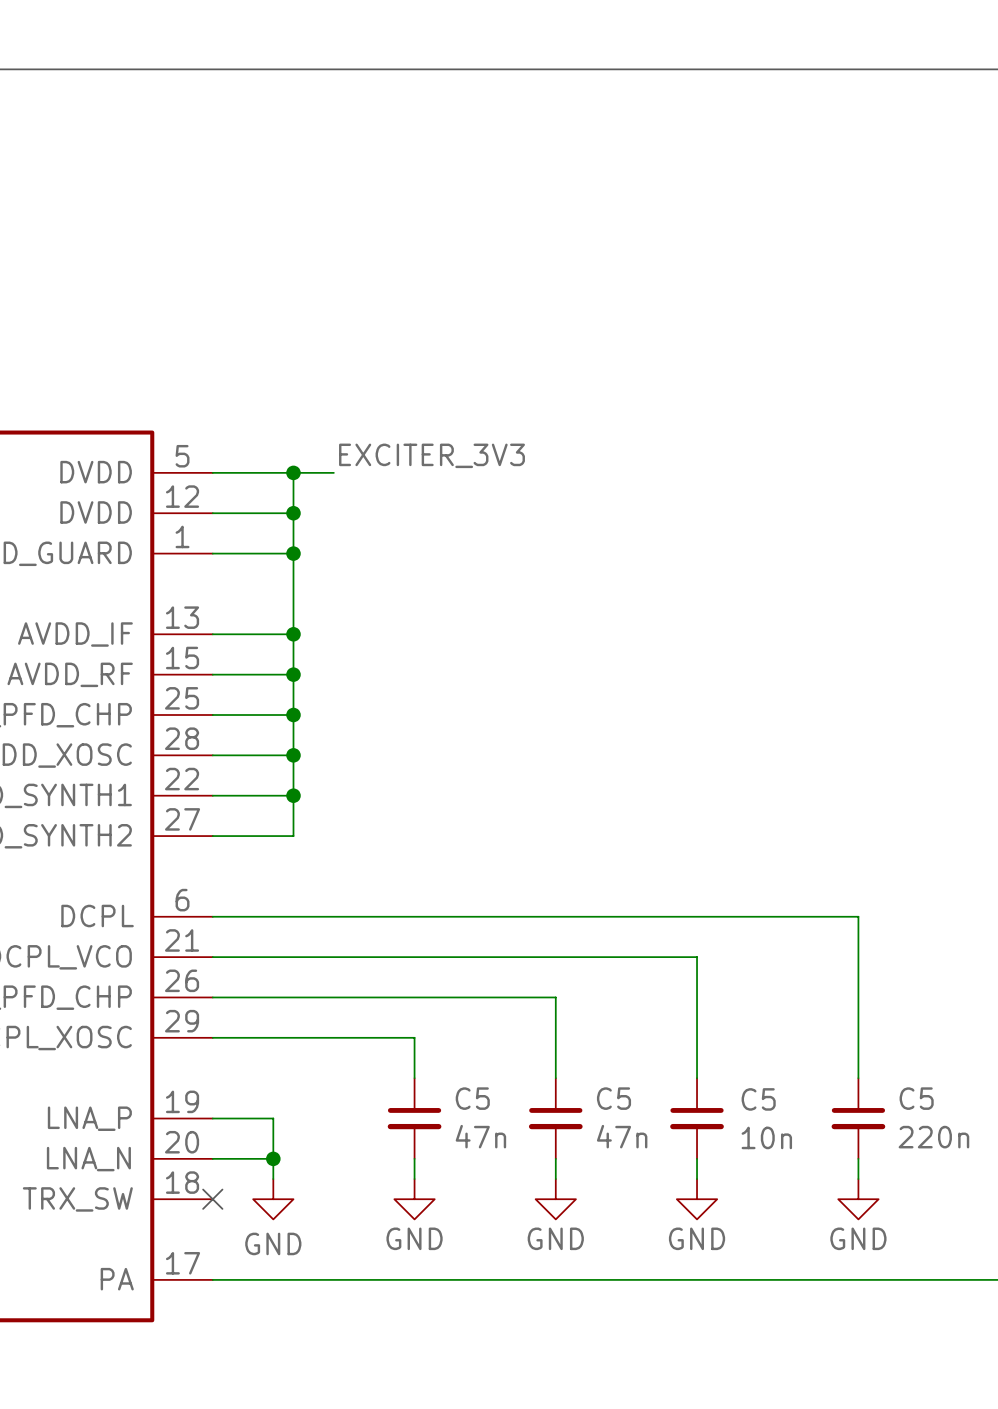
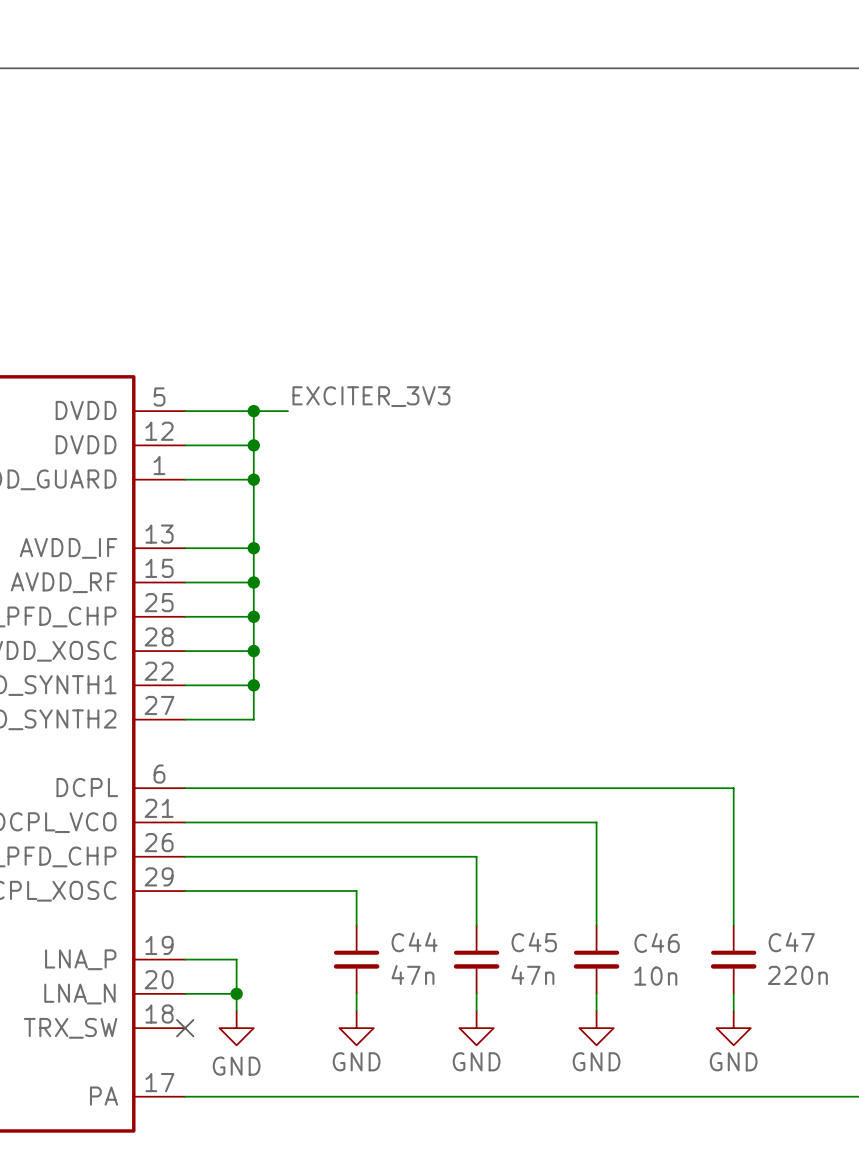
C5 name: C5 (472, 1098) -> C44 (414, 942)
C5 name: C5 (613, 1098) -> C45 (534, 942)
C5 name: C5 (916, 1098) -> C47 (791, 942)
C5 name: C5 (758, 1099) -> C46 (657, 942)

